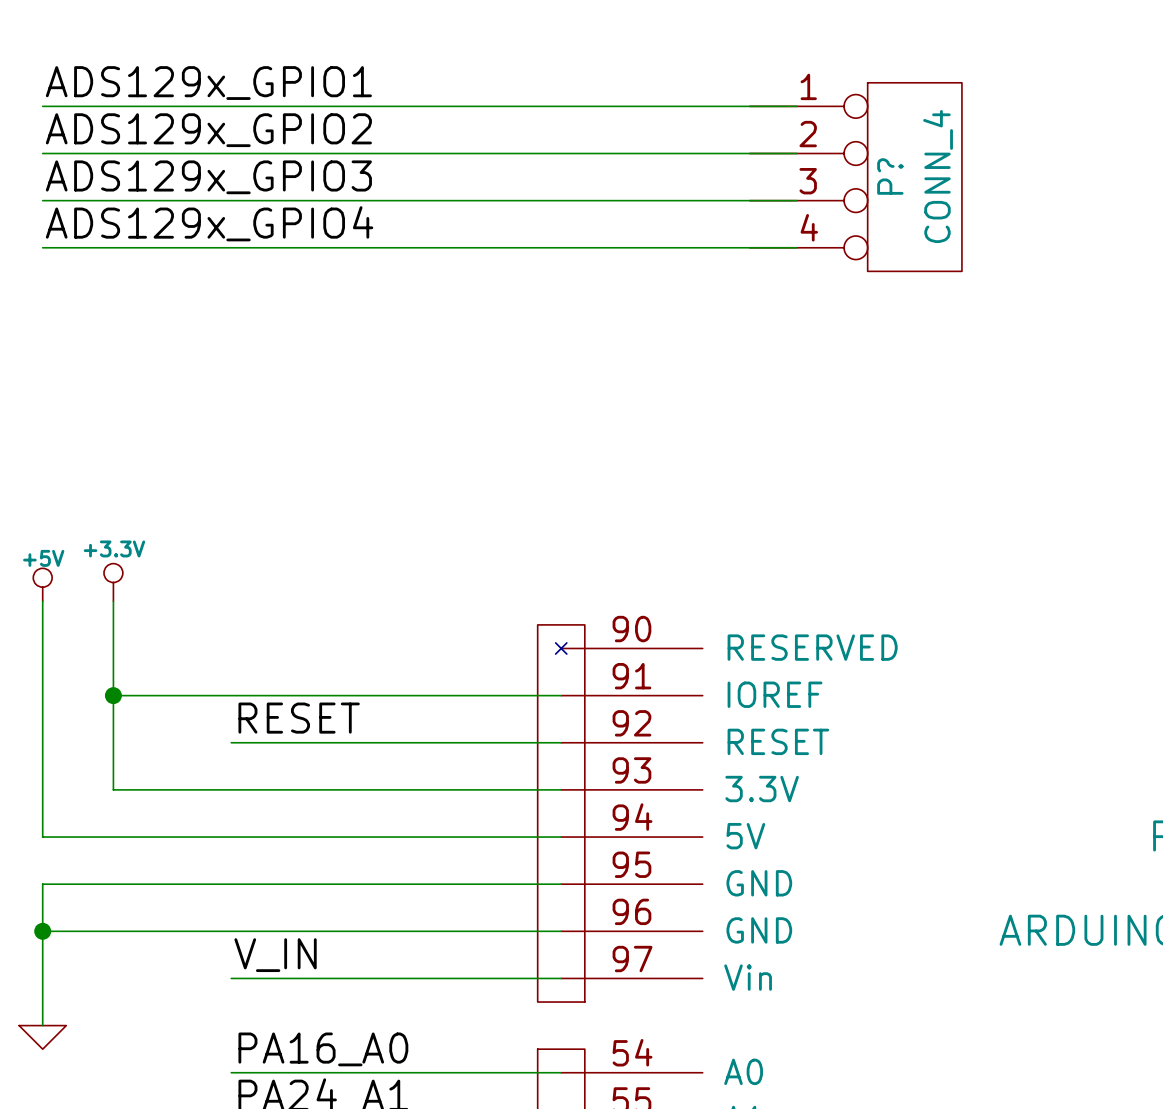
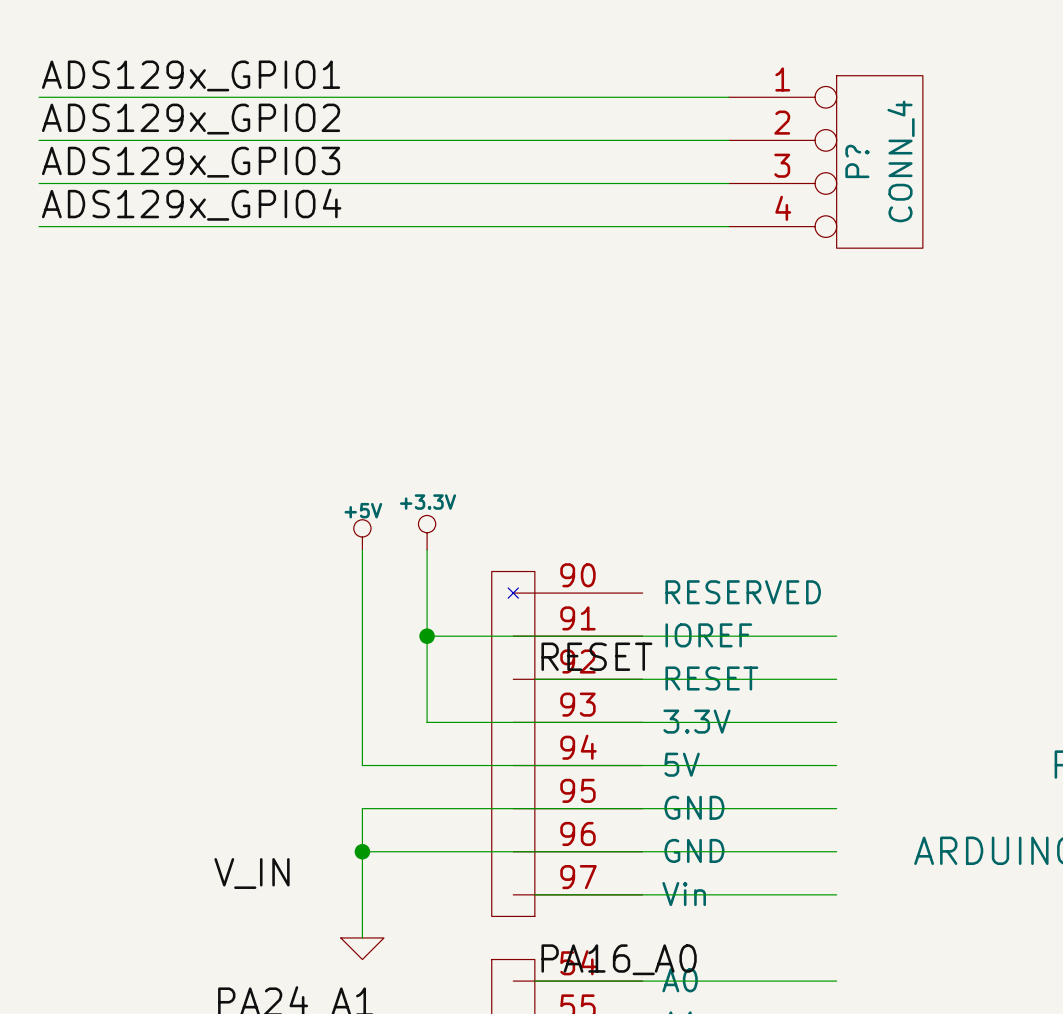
P? position: (855, 177) -> (825, 161)
power symbol position: +3.3V (113, 582) -> +3.3V (427, 532)
power symbol position: +5V (42, 584) -> +5V (362, 534)
wire: (42, 601) (42, 837) (396, 837) -> (362, 549) (362, 765)
wire: (113, 601) (113, 789) (466, 789) -> (427, 549) (427, 722)
wire: (113, 695) (466, 695) -> (513, 636) (836, 636)
junction: (113, 695) -> none
junction: none -> (427, 636)
label position: RESET (299, 718) -> RESET (596, 656)
wire: (231, 742) (561, 742) -> (534, 679) (836, 679)
wire: none -> (513, 722) (836, 722)
wire: none -> (513, 765) (836, 765)
wire: (396, 884) (42, 884) (42, 1025) -> (362, 808) (362, 937)
wire: none -> (513, 808) (836, 808)
wire: (42, 931) (396, 931) -> none
junction: (42, 931) -> none
junction: none -> (362, 851)
wire: none -> (513, 851) (836, 851)
wire: (231, 978) (561, 978) -> (534, 894) (836, 894)
power symbol position: (42, 1037) -> (362, 948)
label position: PA16_A0 (323, 1049) -> PA16_A0 (619, 959)
wire: (231, 1072) (561, 1072) -> (534, 981) (836, 981)

